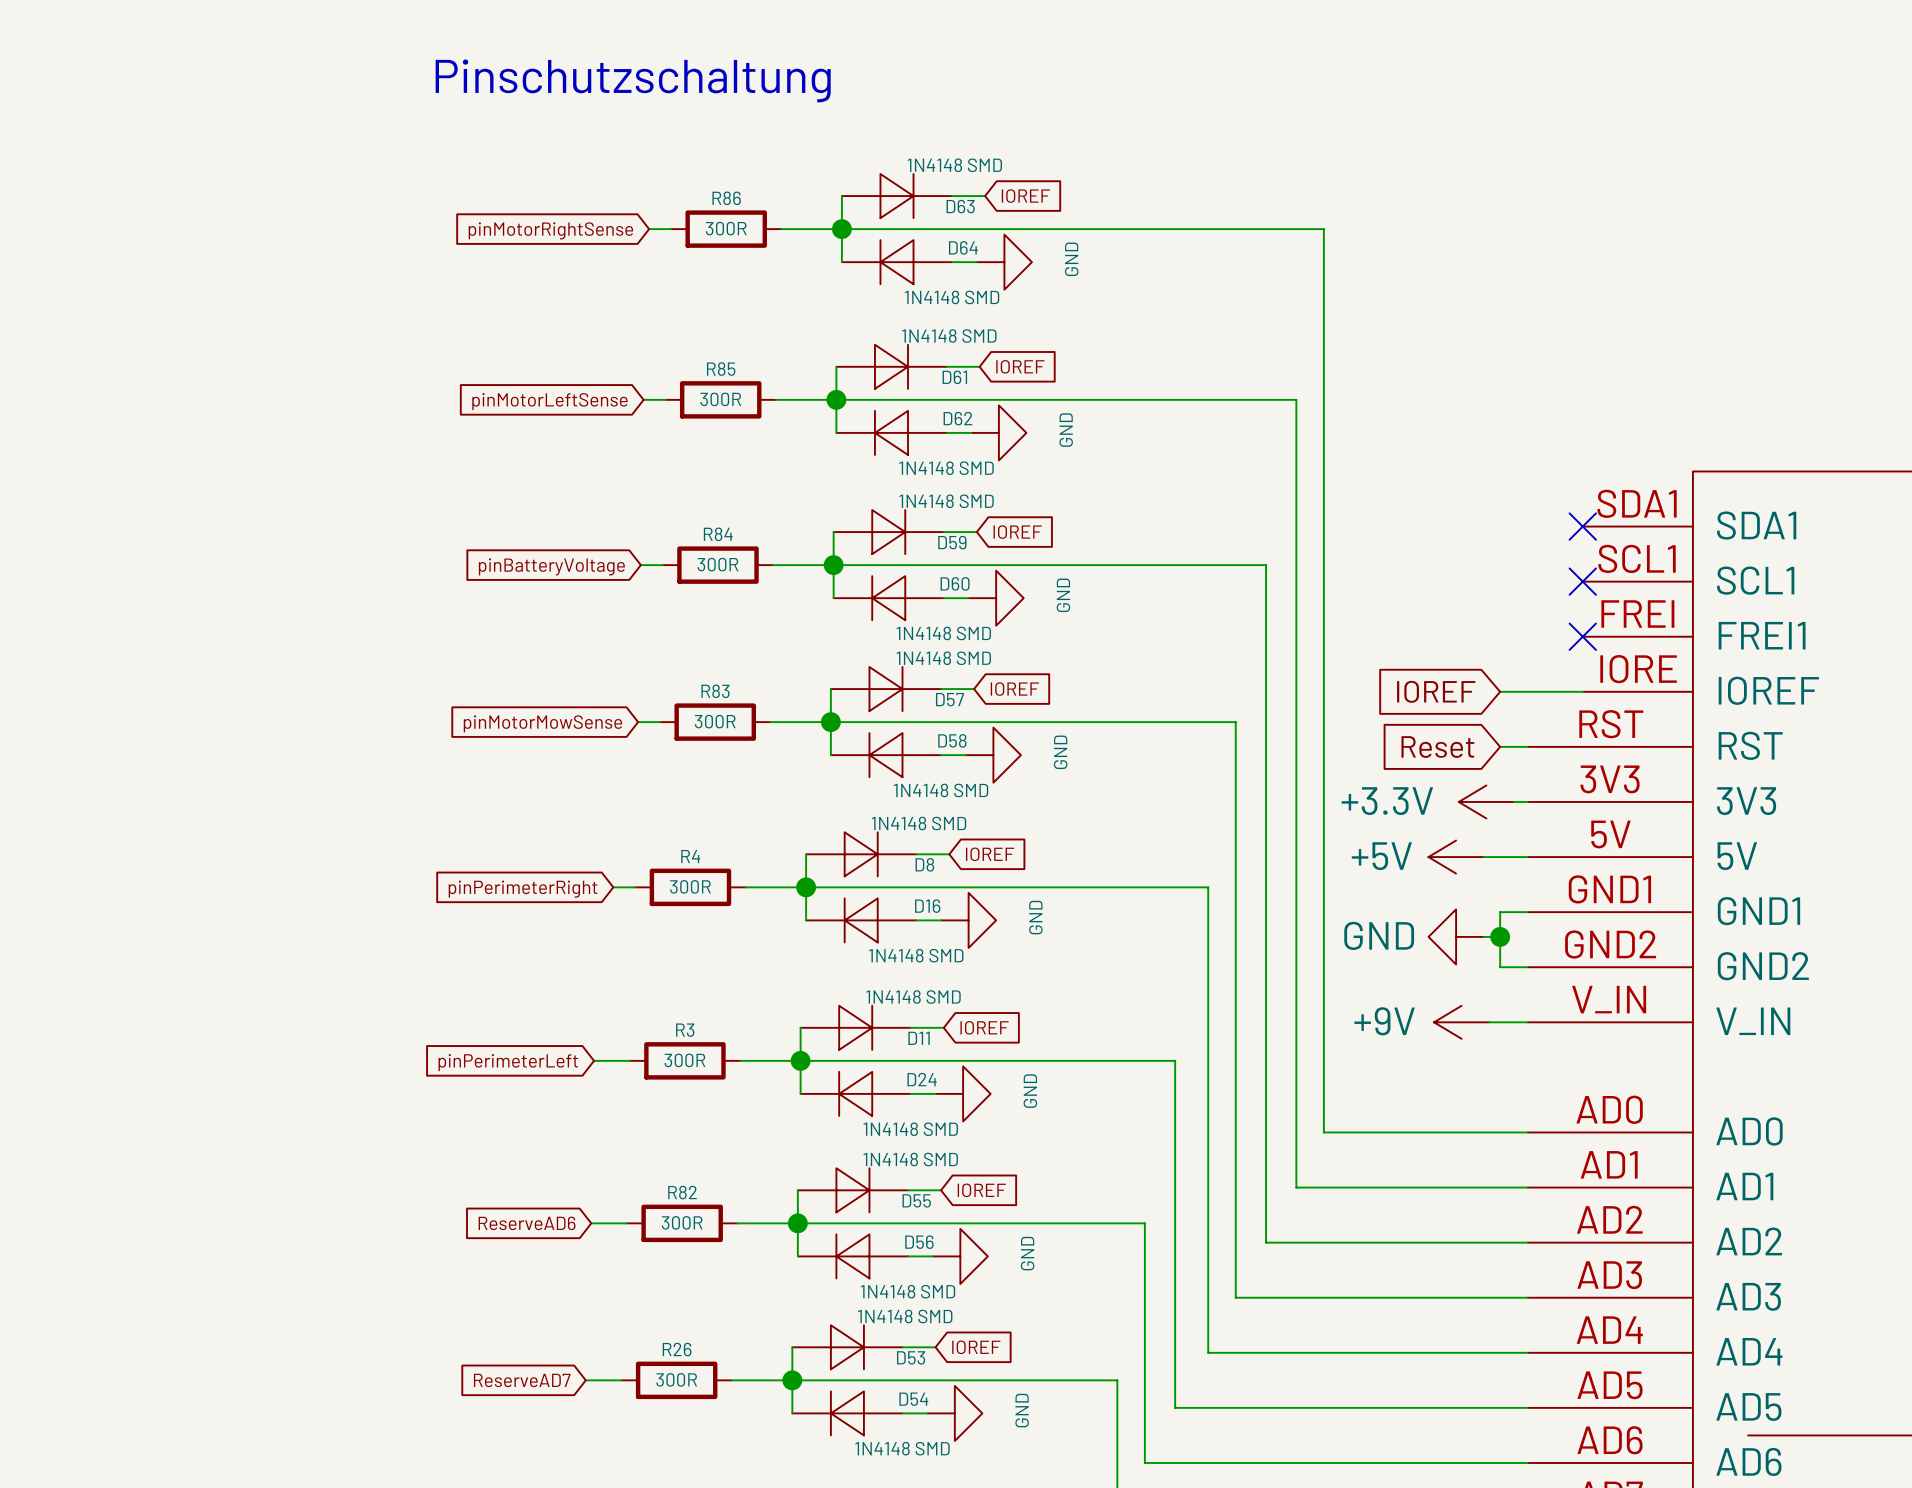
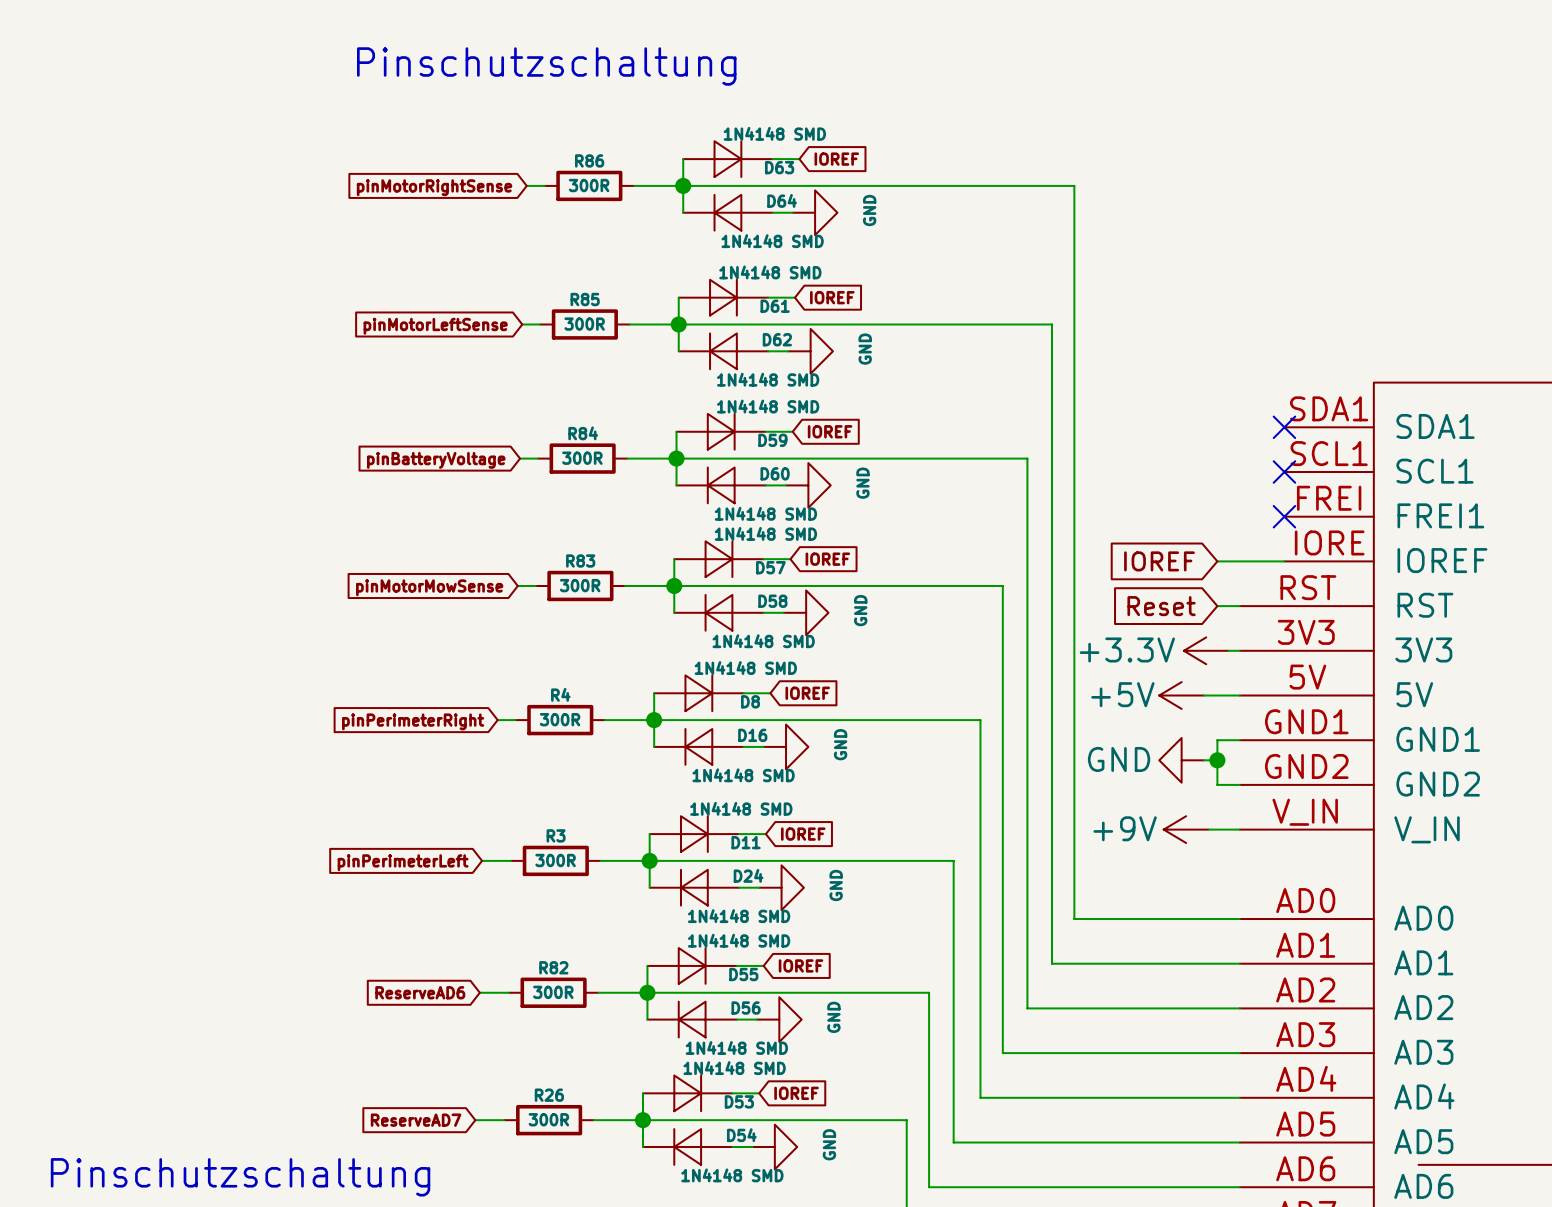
text: none -> Pinschutzschaltung (240, 1177)

